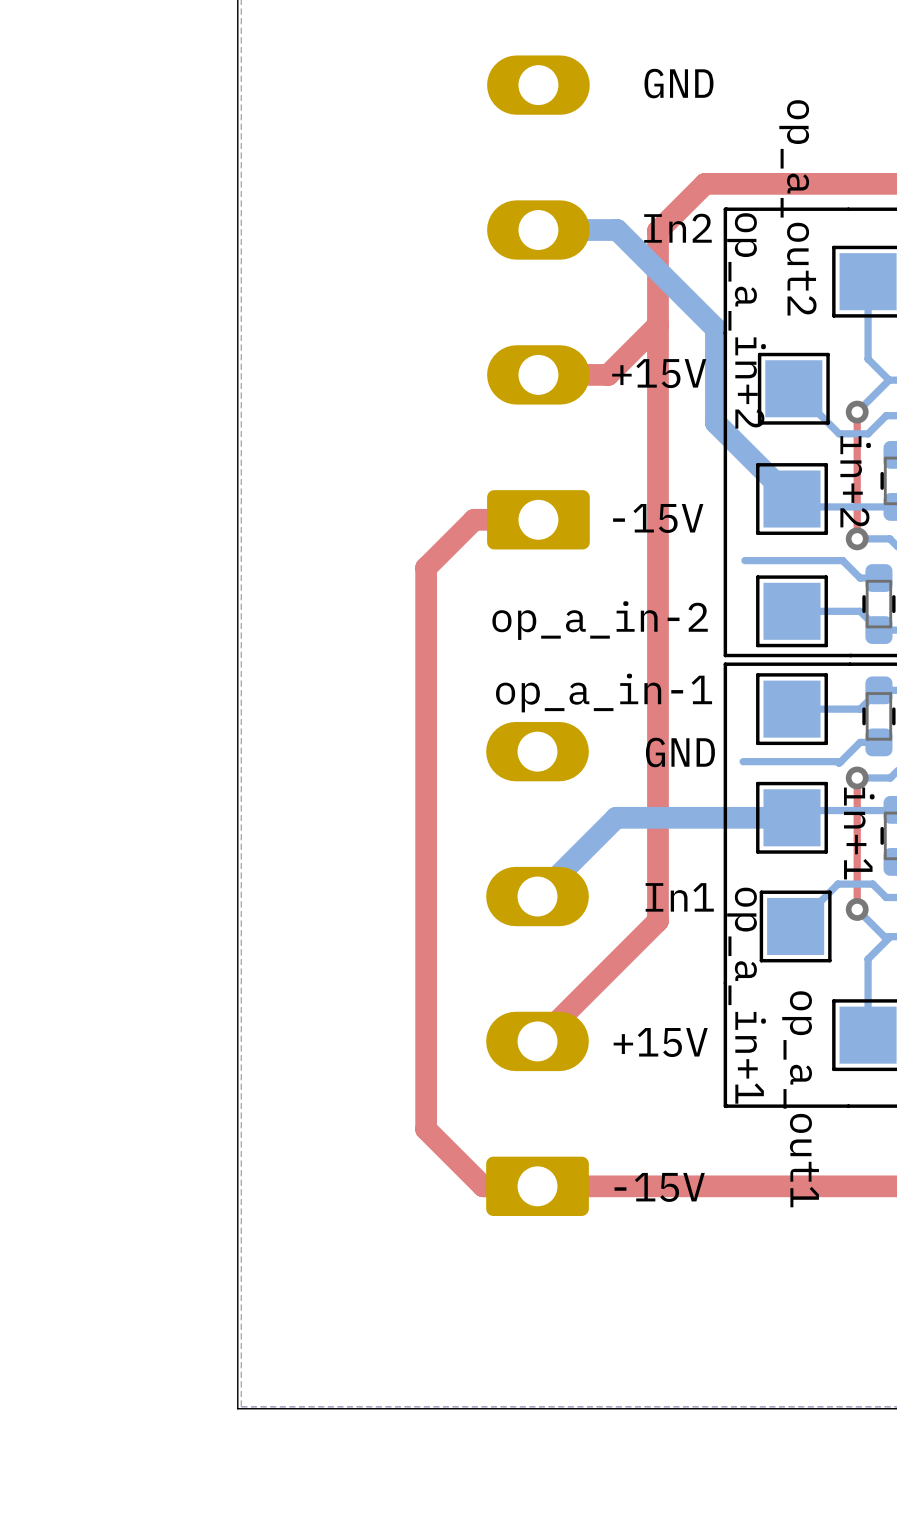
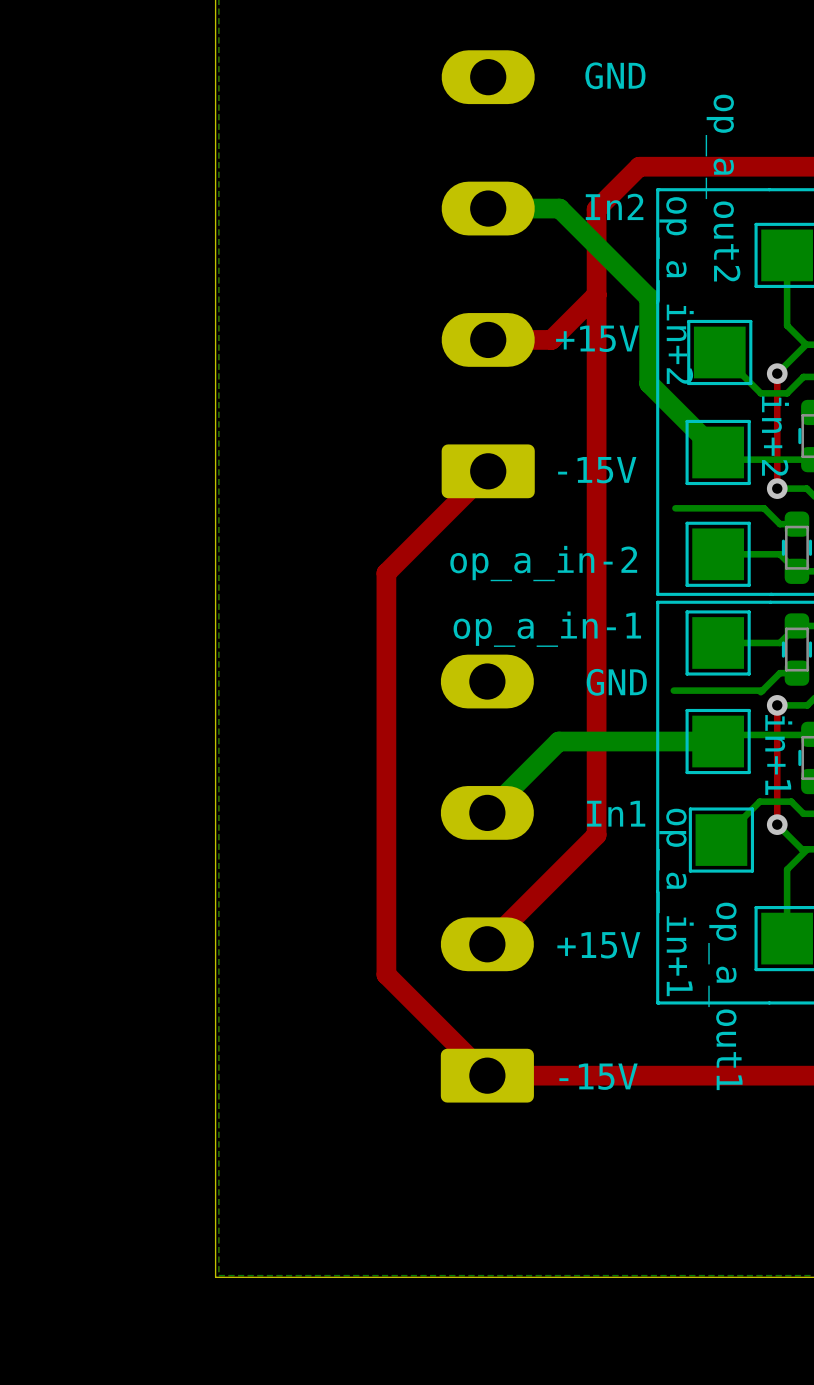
top track: (538, 519) (474, 519) (426, 567) (426, 632) -> (488, 471) (386, 573)
top track: (426, 1074) (426, 1129) (483, 1186) (537, 1186) -> (386, 974) (487, 1075)

